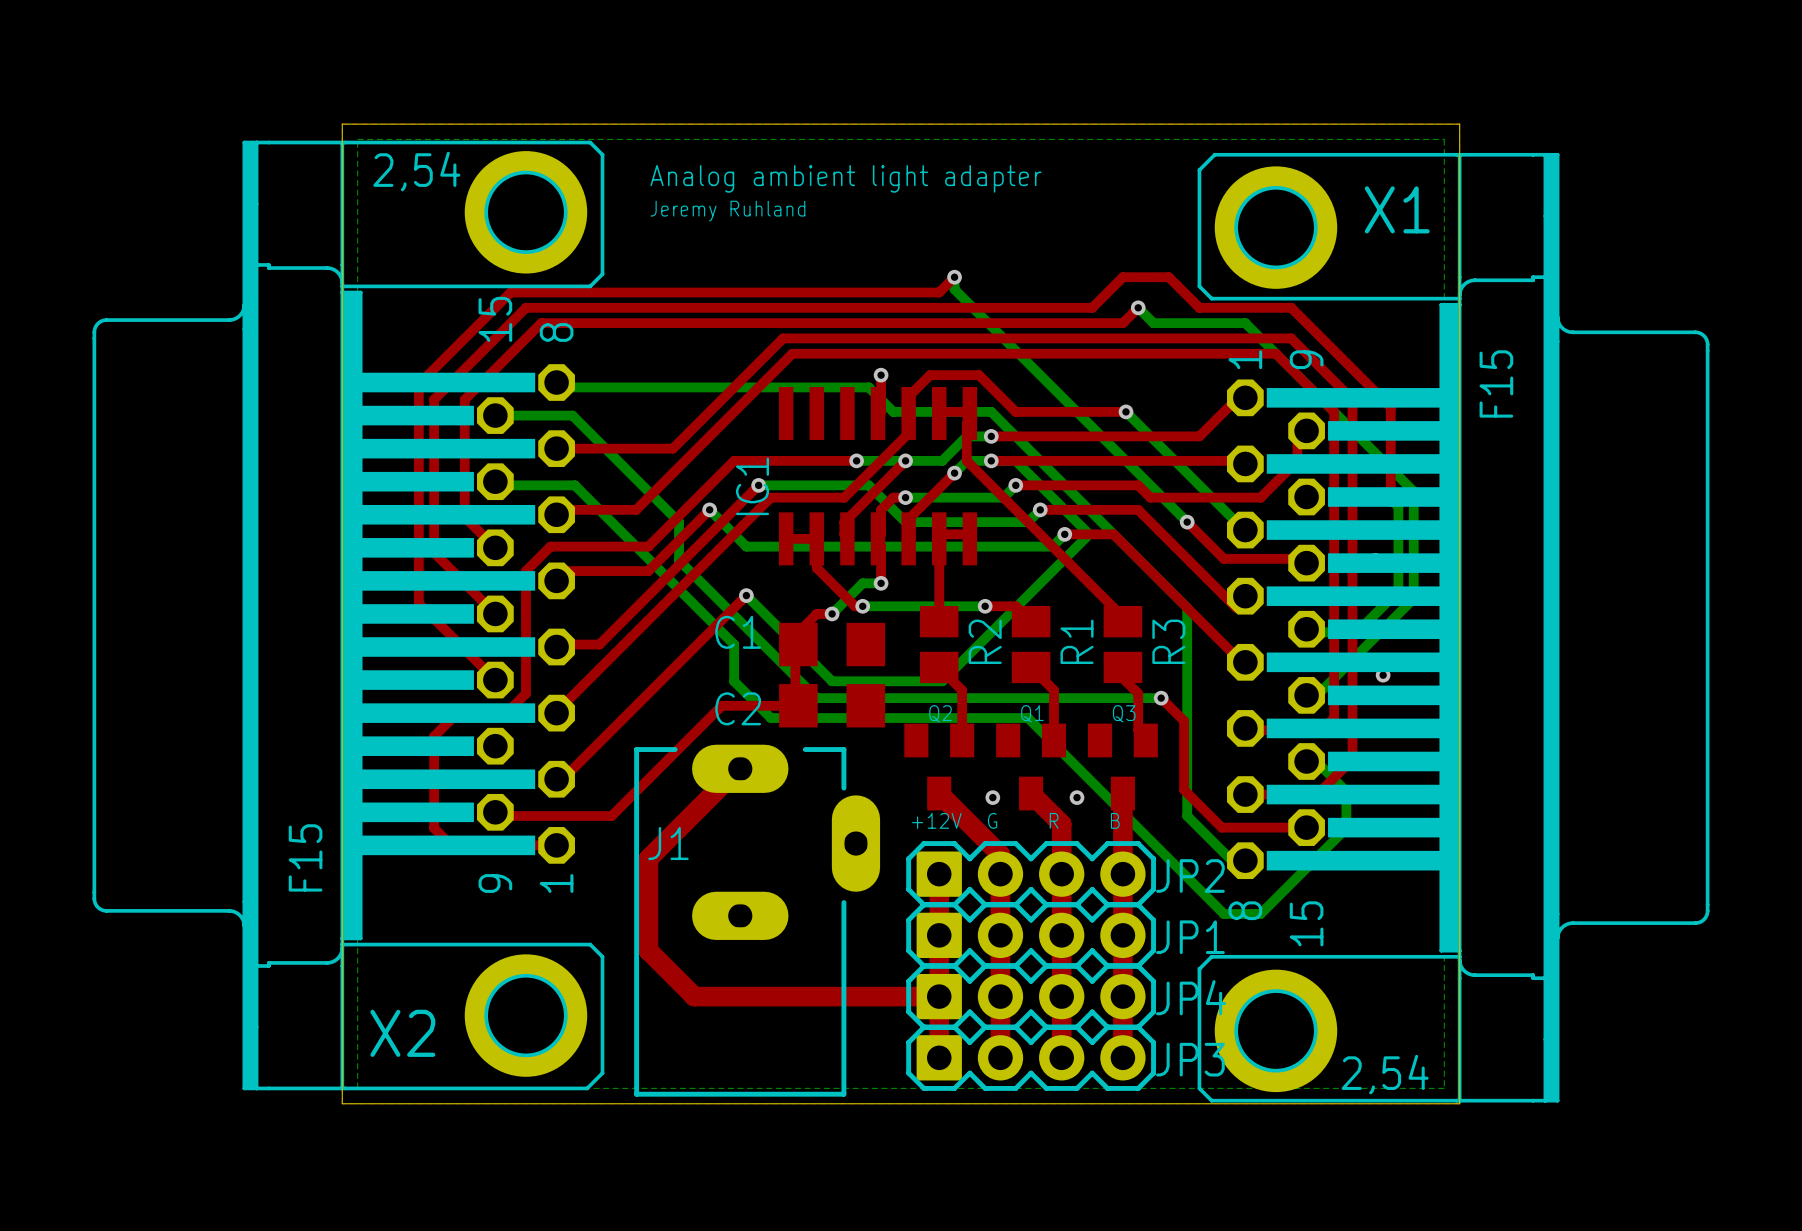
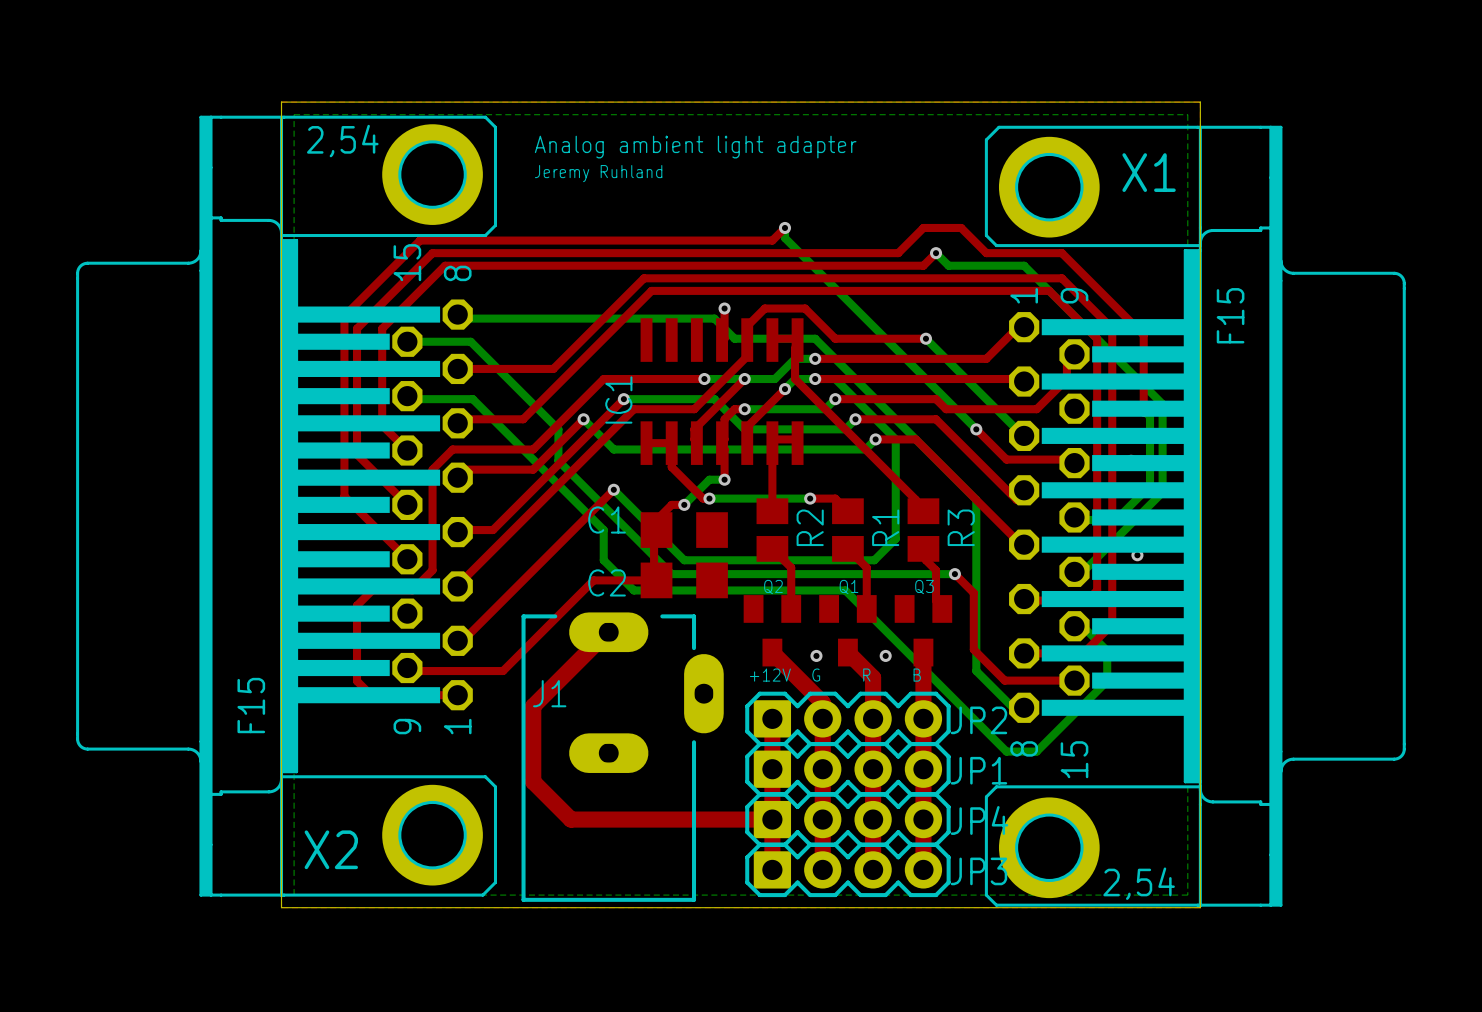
bottom track: (1089, 534) (942, 681) -> (895, 439) (895, 538) (874, 560) (774, 560)

